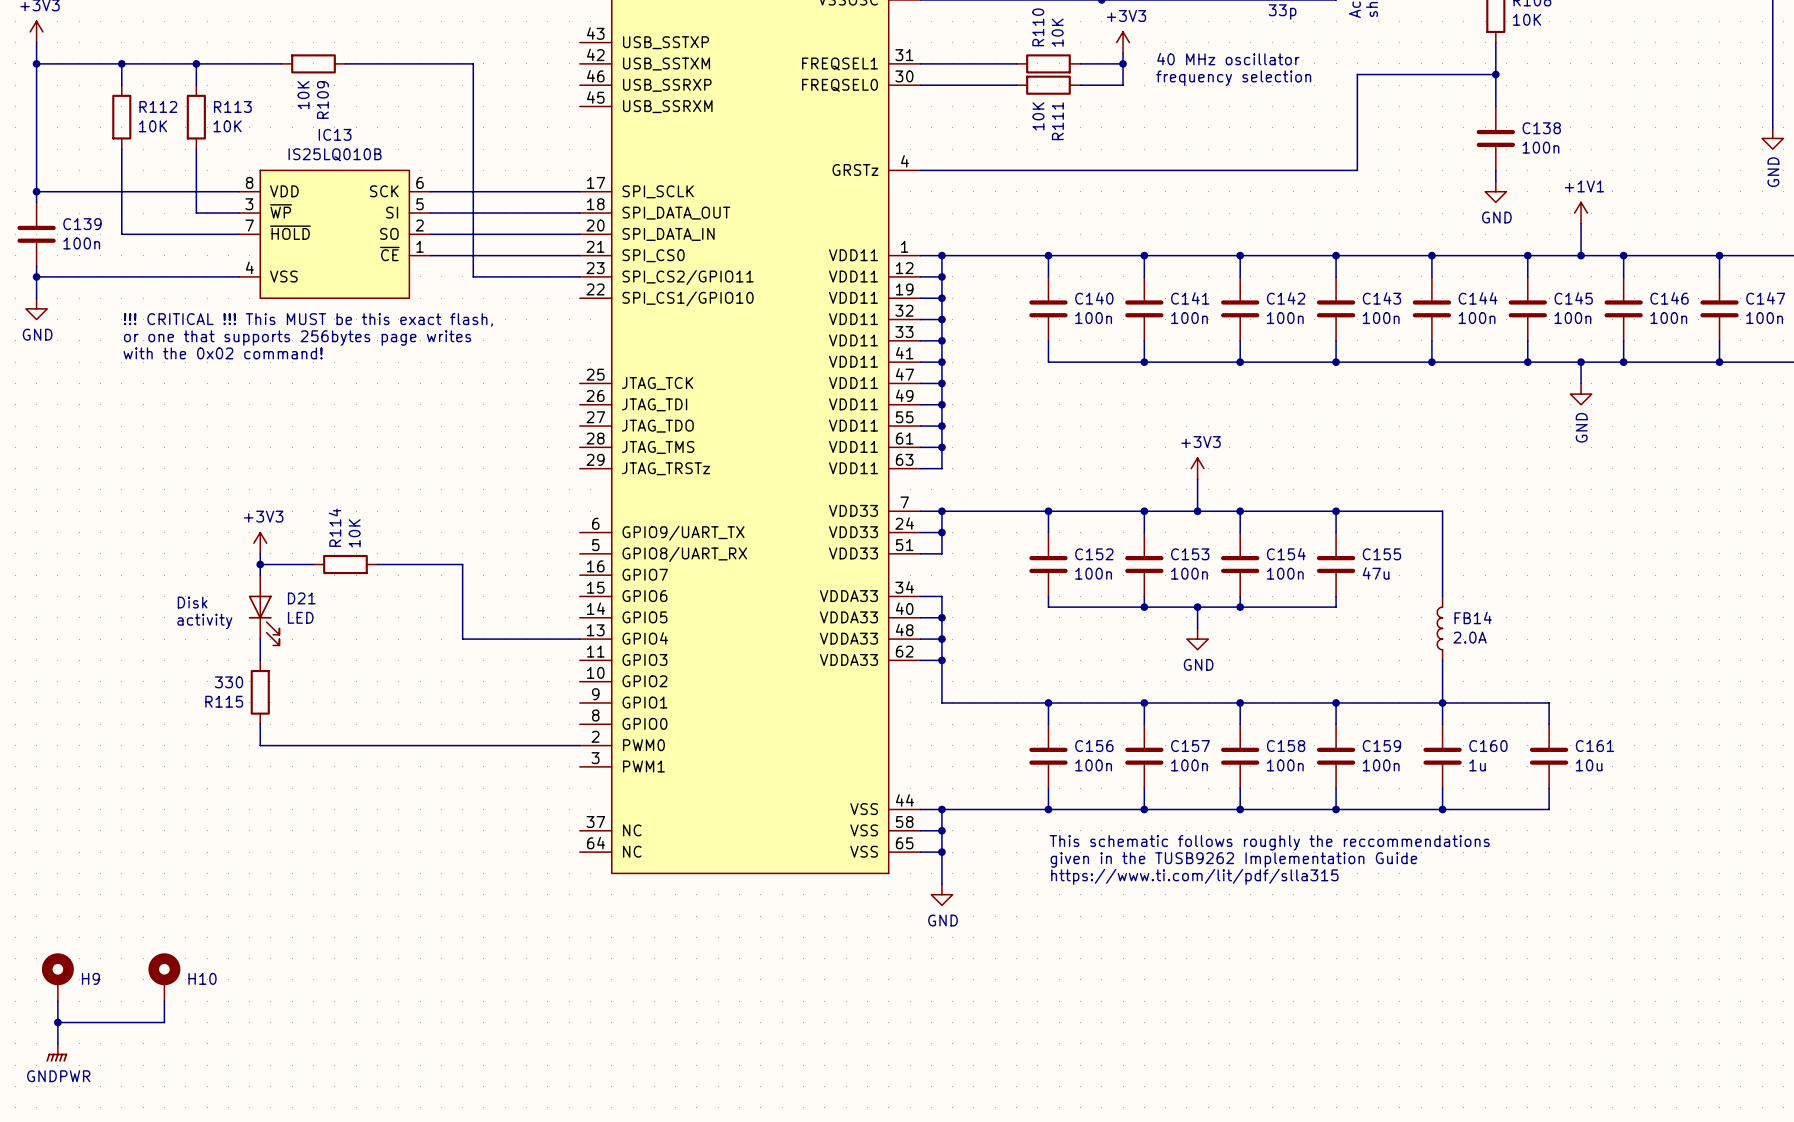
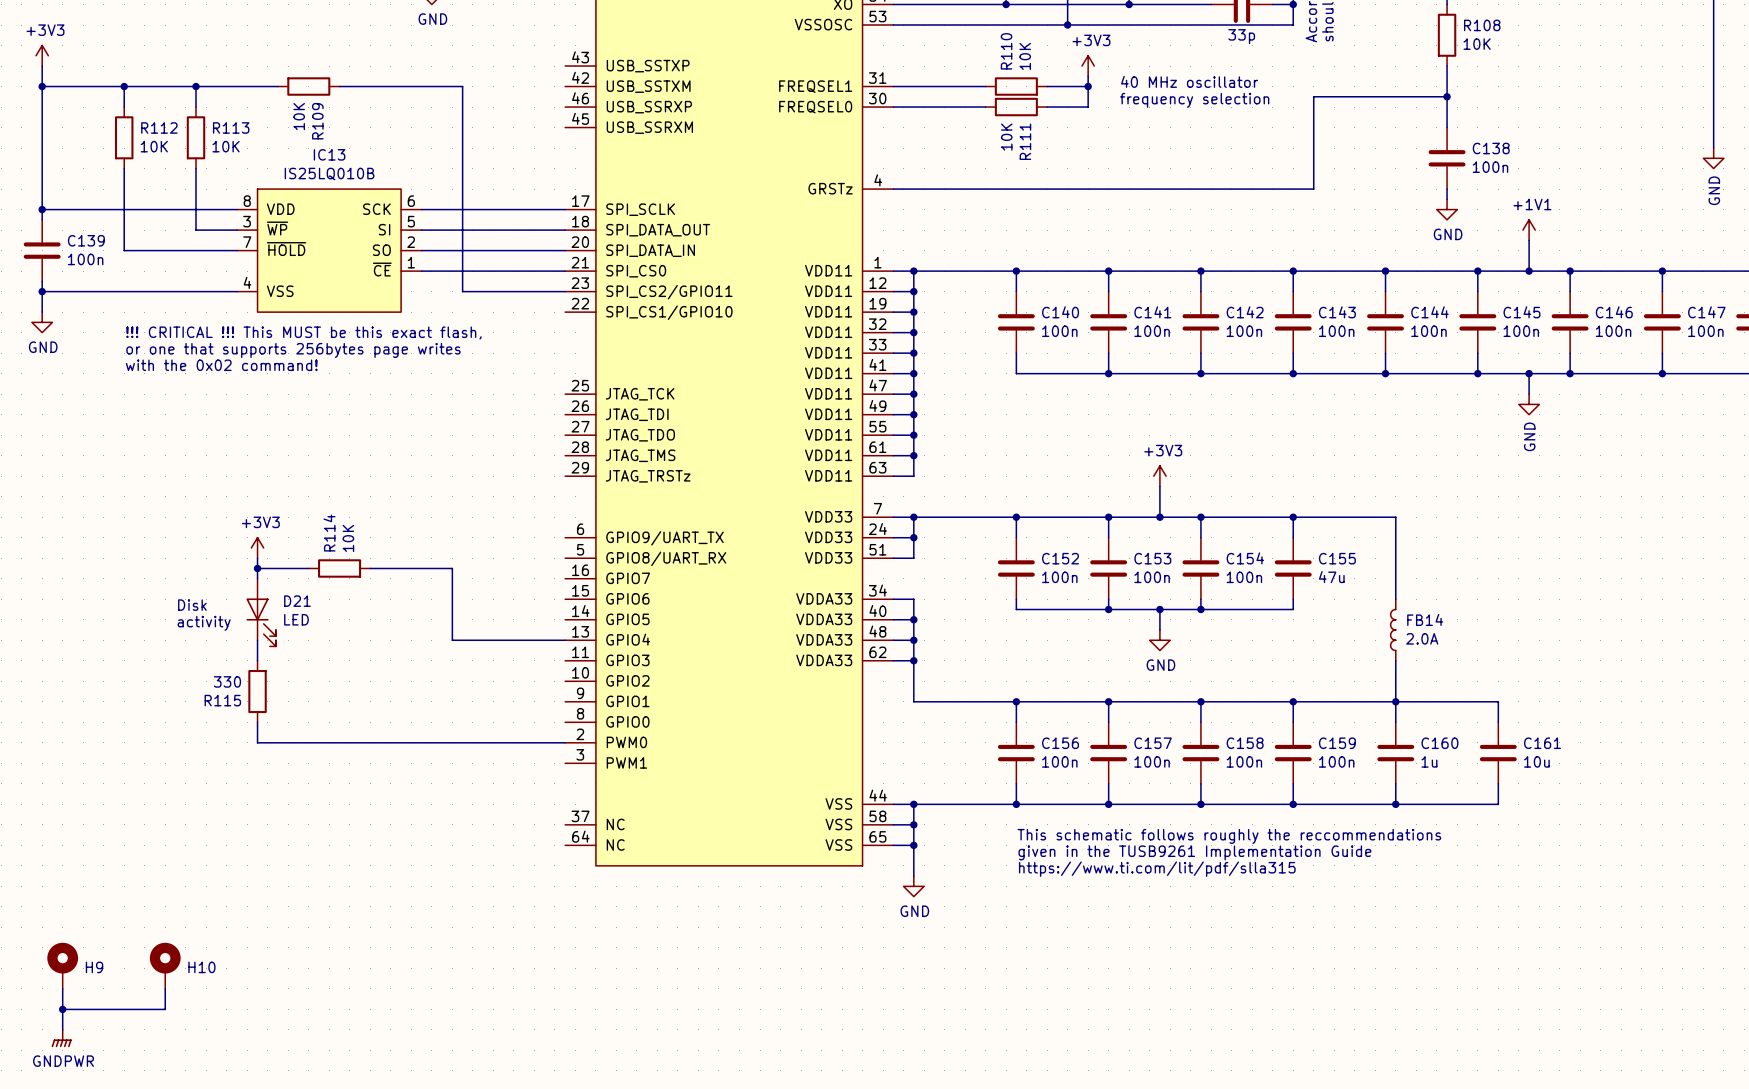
text: given in the TUSB9262 Implementation Guide (1233, 859) -> given in the TUSB9261 Implementation Guide (1194, 852)

